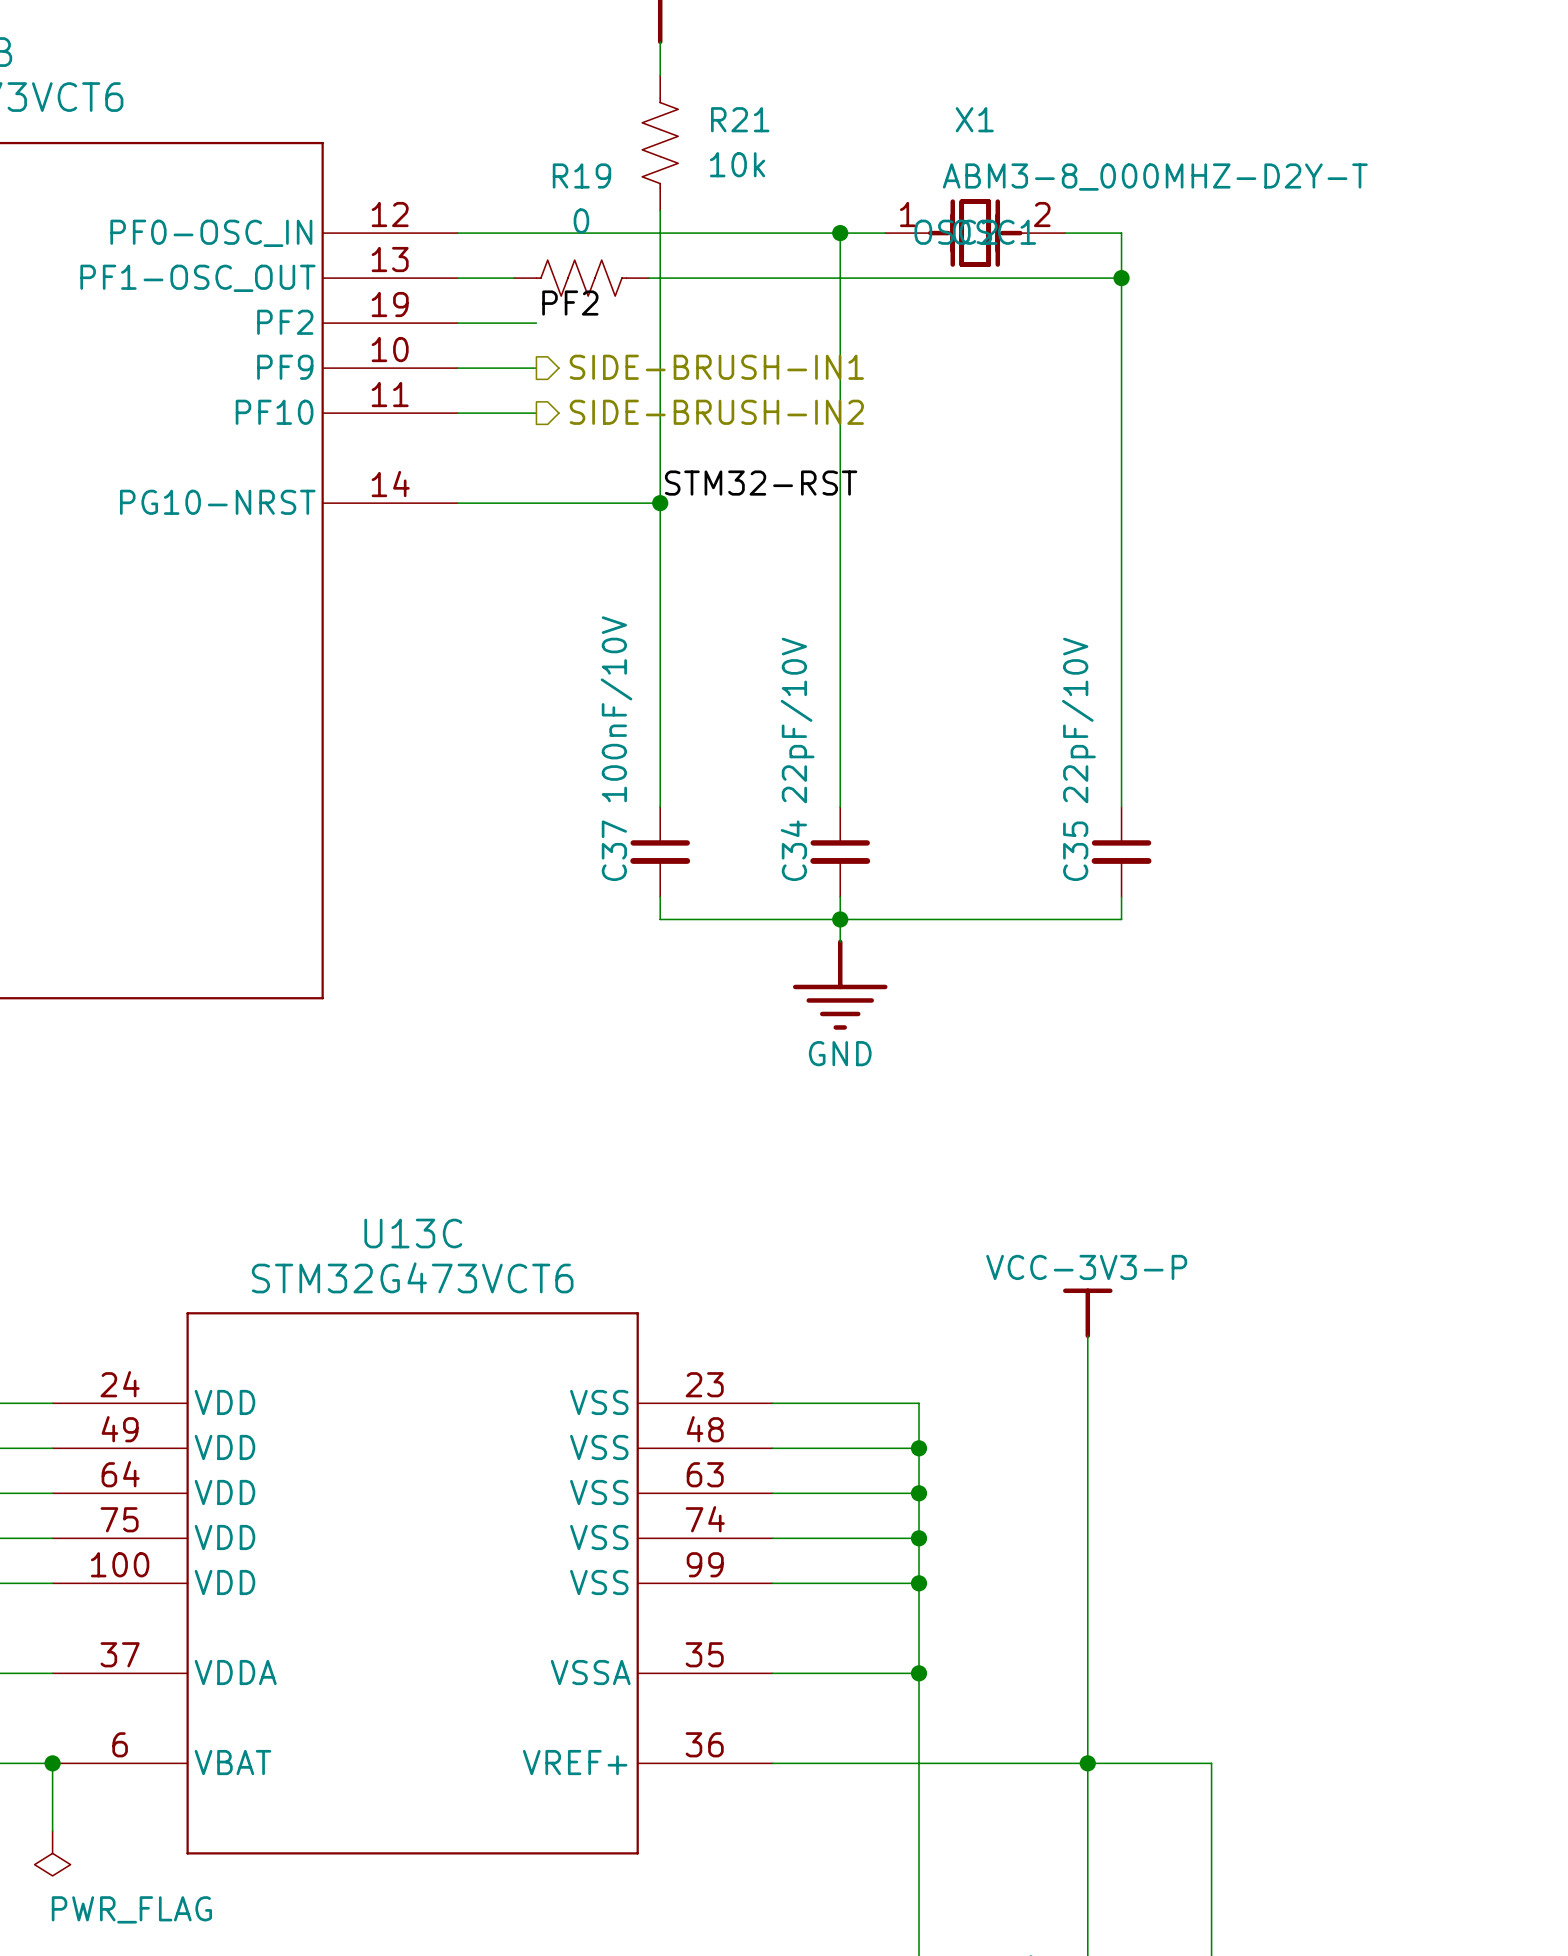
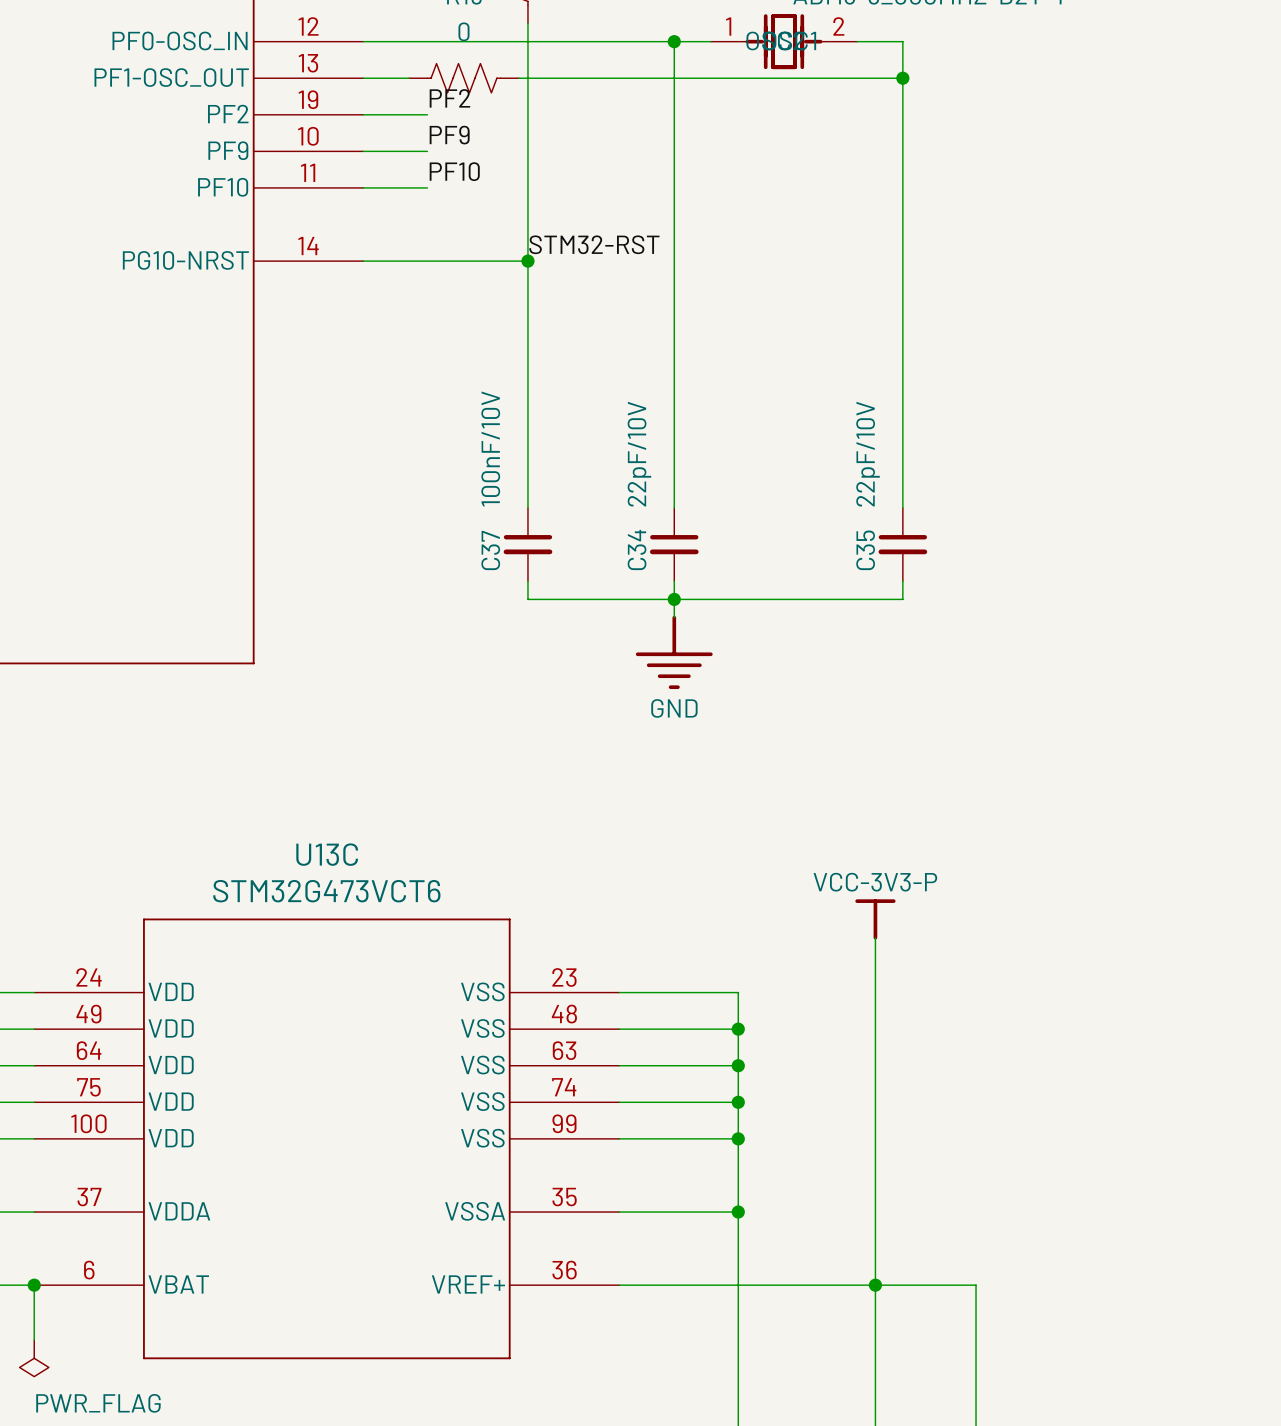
label: none -> PF9 (449, 135)
hierarchical label: SIDE-BRUSH-IN1 (716, 367) -> none
label: none -> PF10 (454, 171)
hierarchical label: SIDE-BRUSH-IN2 (716, 412) -> none

